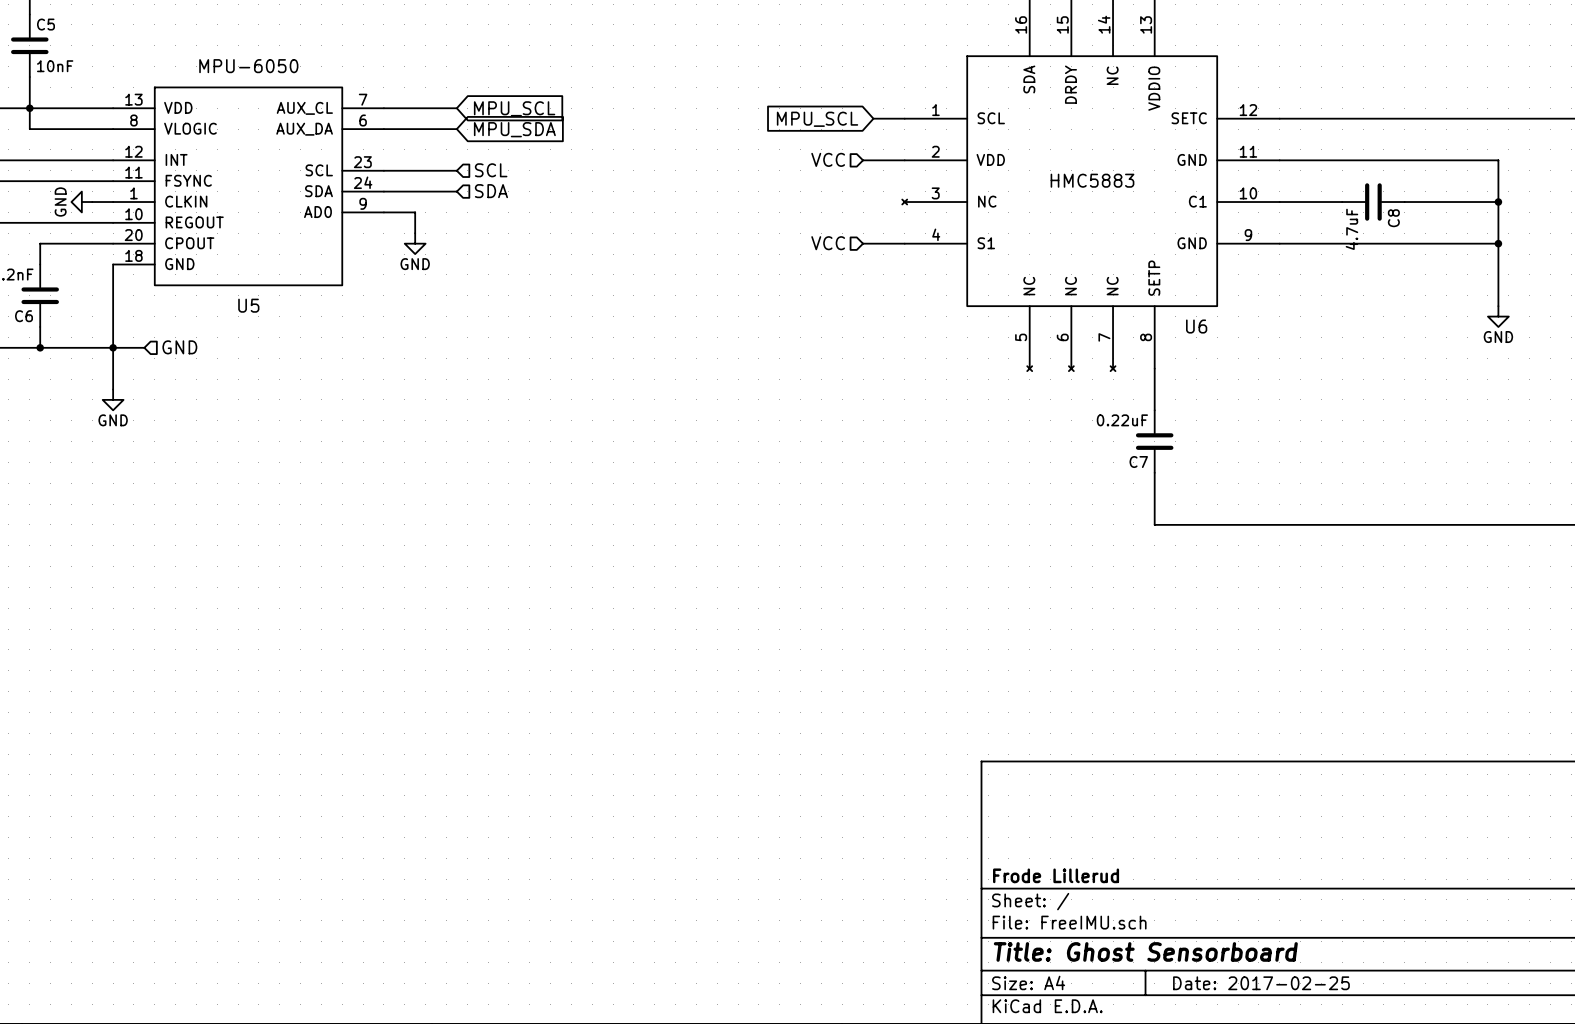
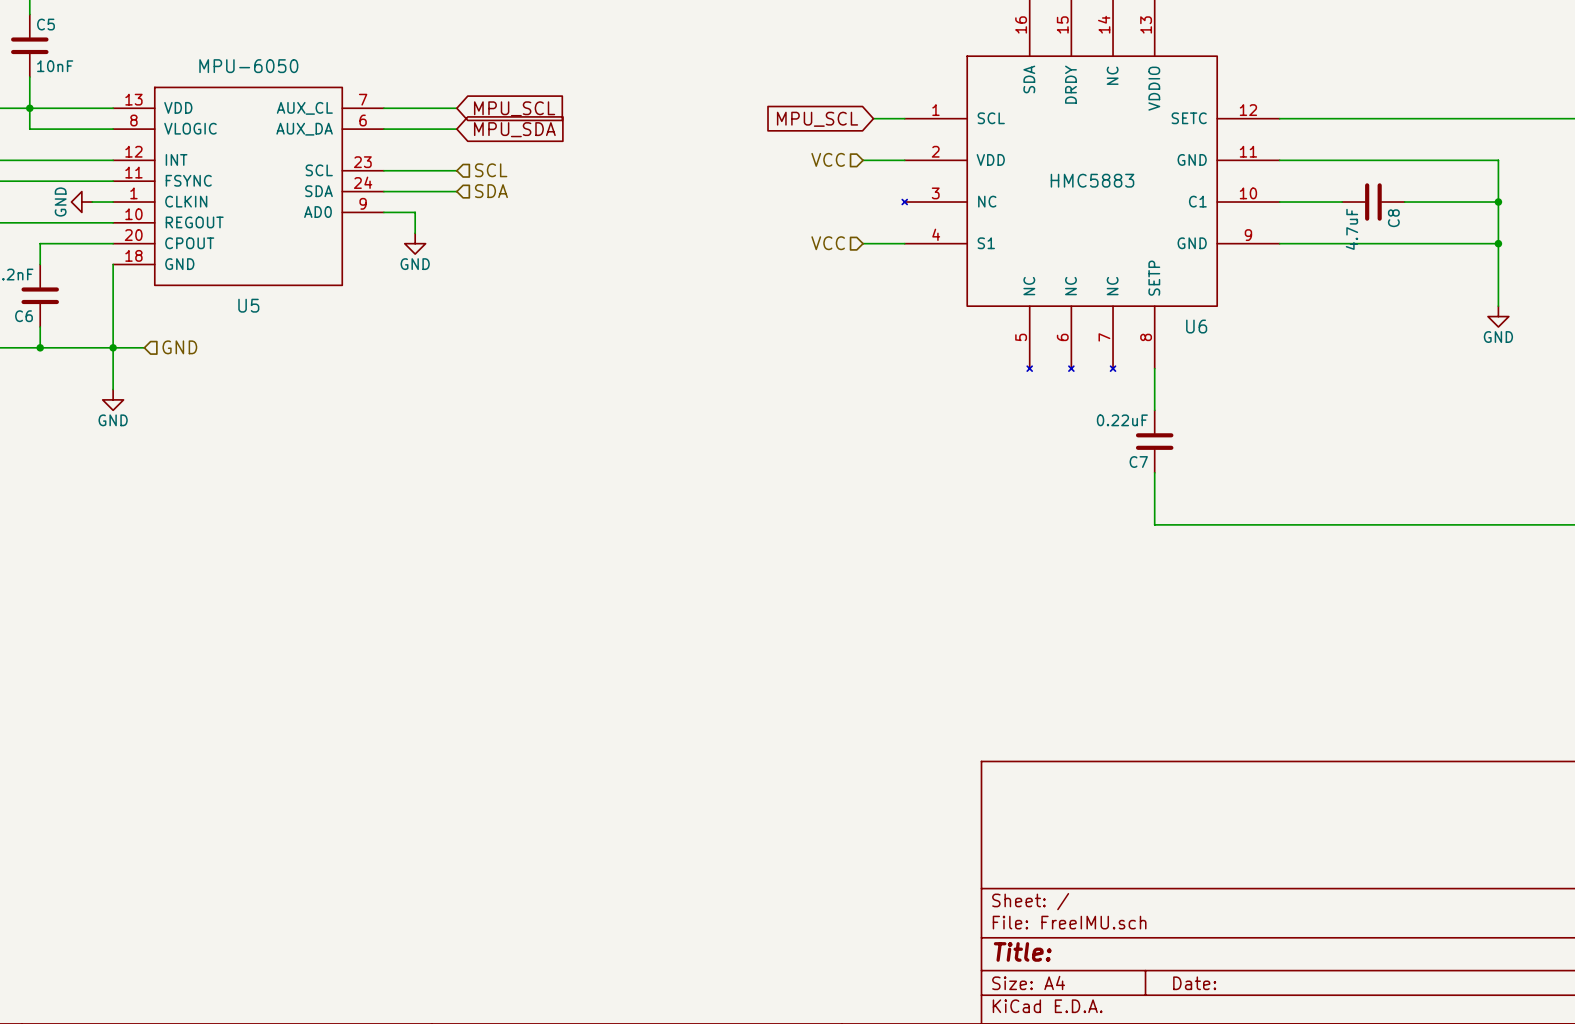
title block: Frode Lillerud (1056, 875) -> none
title block: Title: Ghost Sensorboard (1145, 951) -> Title: (1022, 951)
title block: Date: 2017-02-25 (1261, 983) -> Date: (1194, 983)

